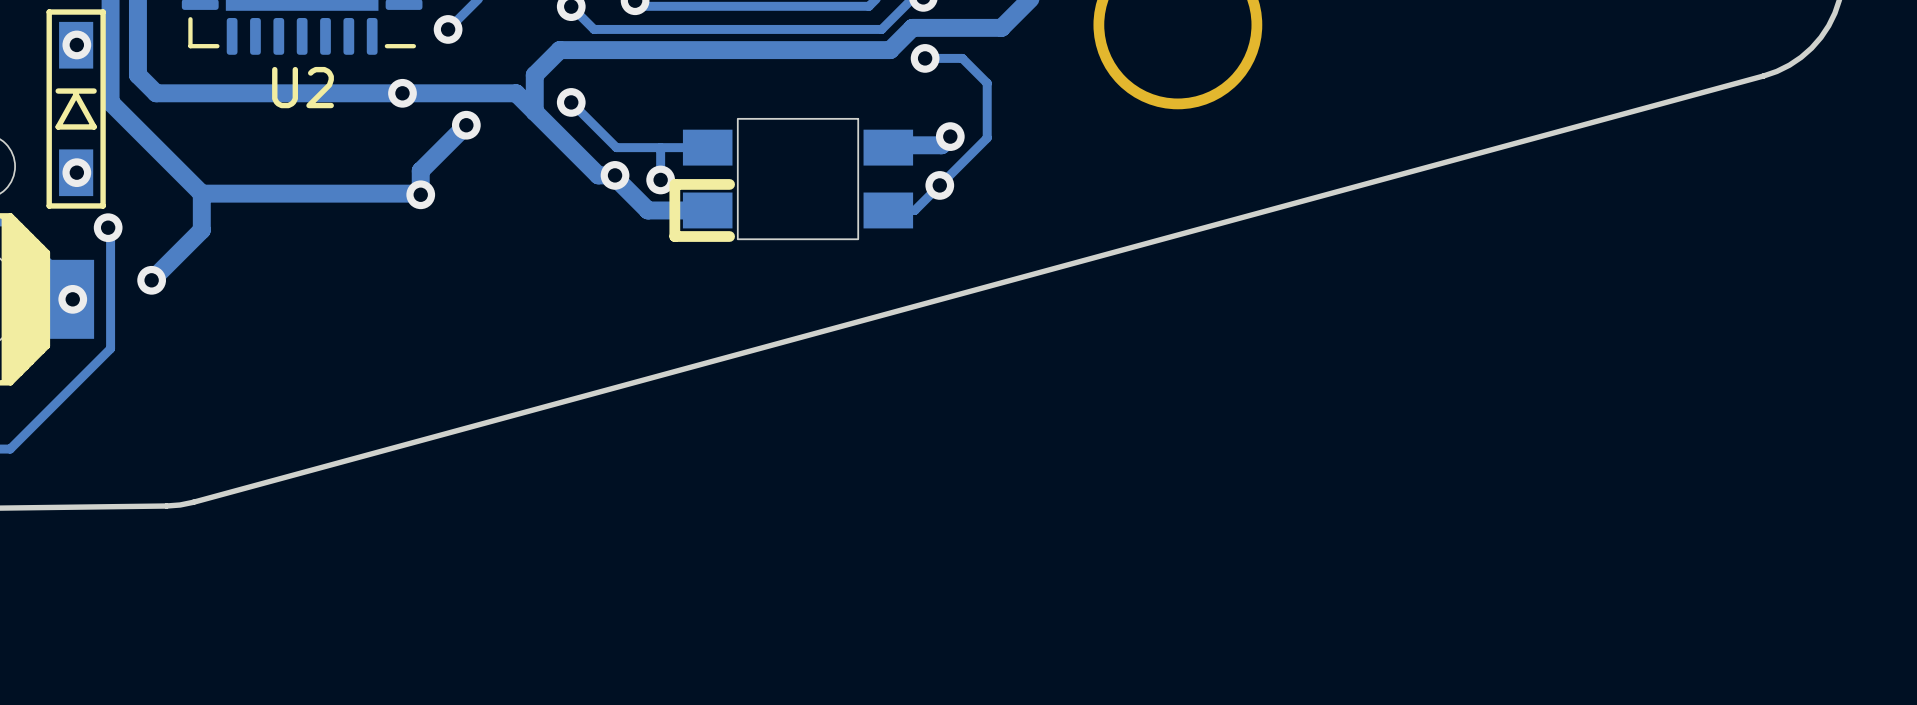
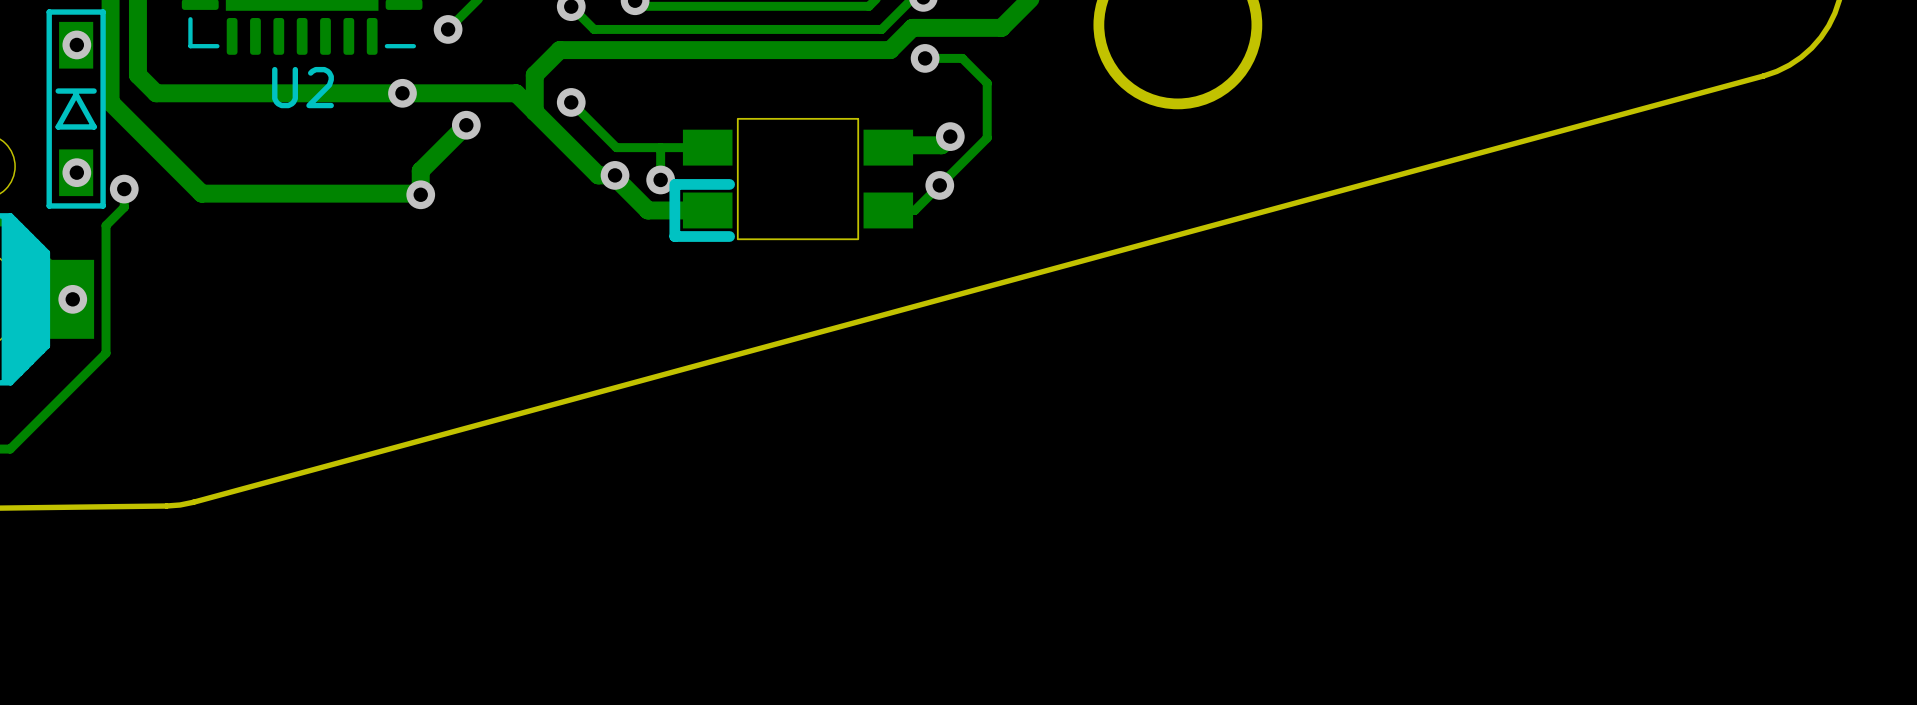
track: (201, 193) (201, 230) (151, 280) -> none
track: (108, 227) (110, 230) (110, 348) (106, 353) -> (124, 189) (124, 207) (106, 225) (106, 353)
via position: (108, 227) -> (124, 189)
via: (151, 280) -> none

